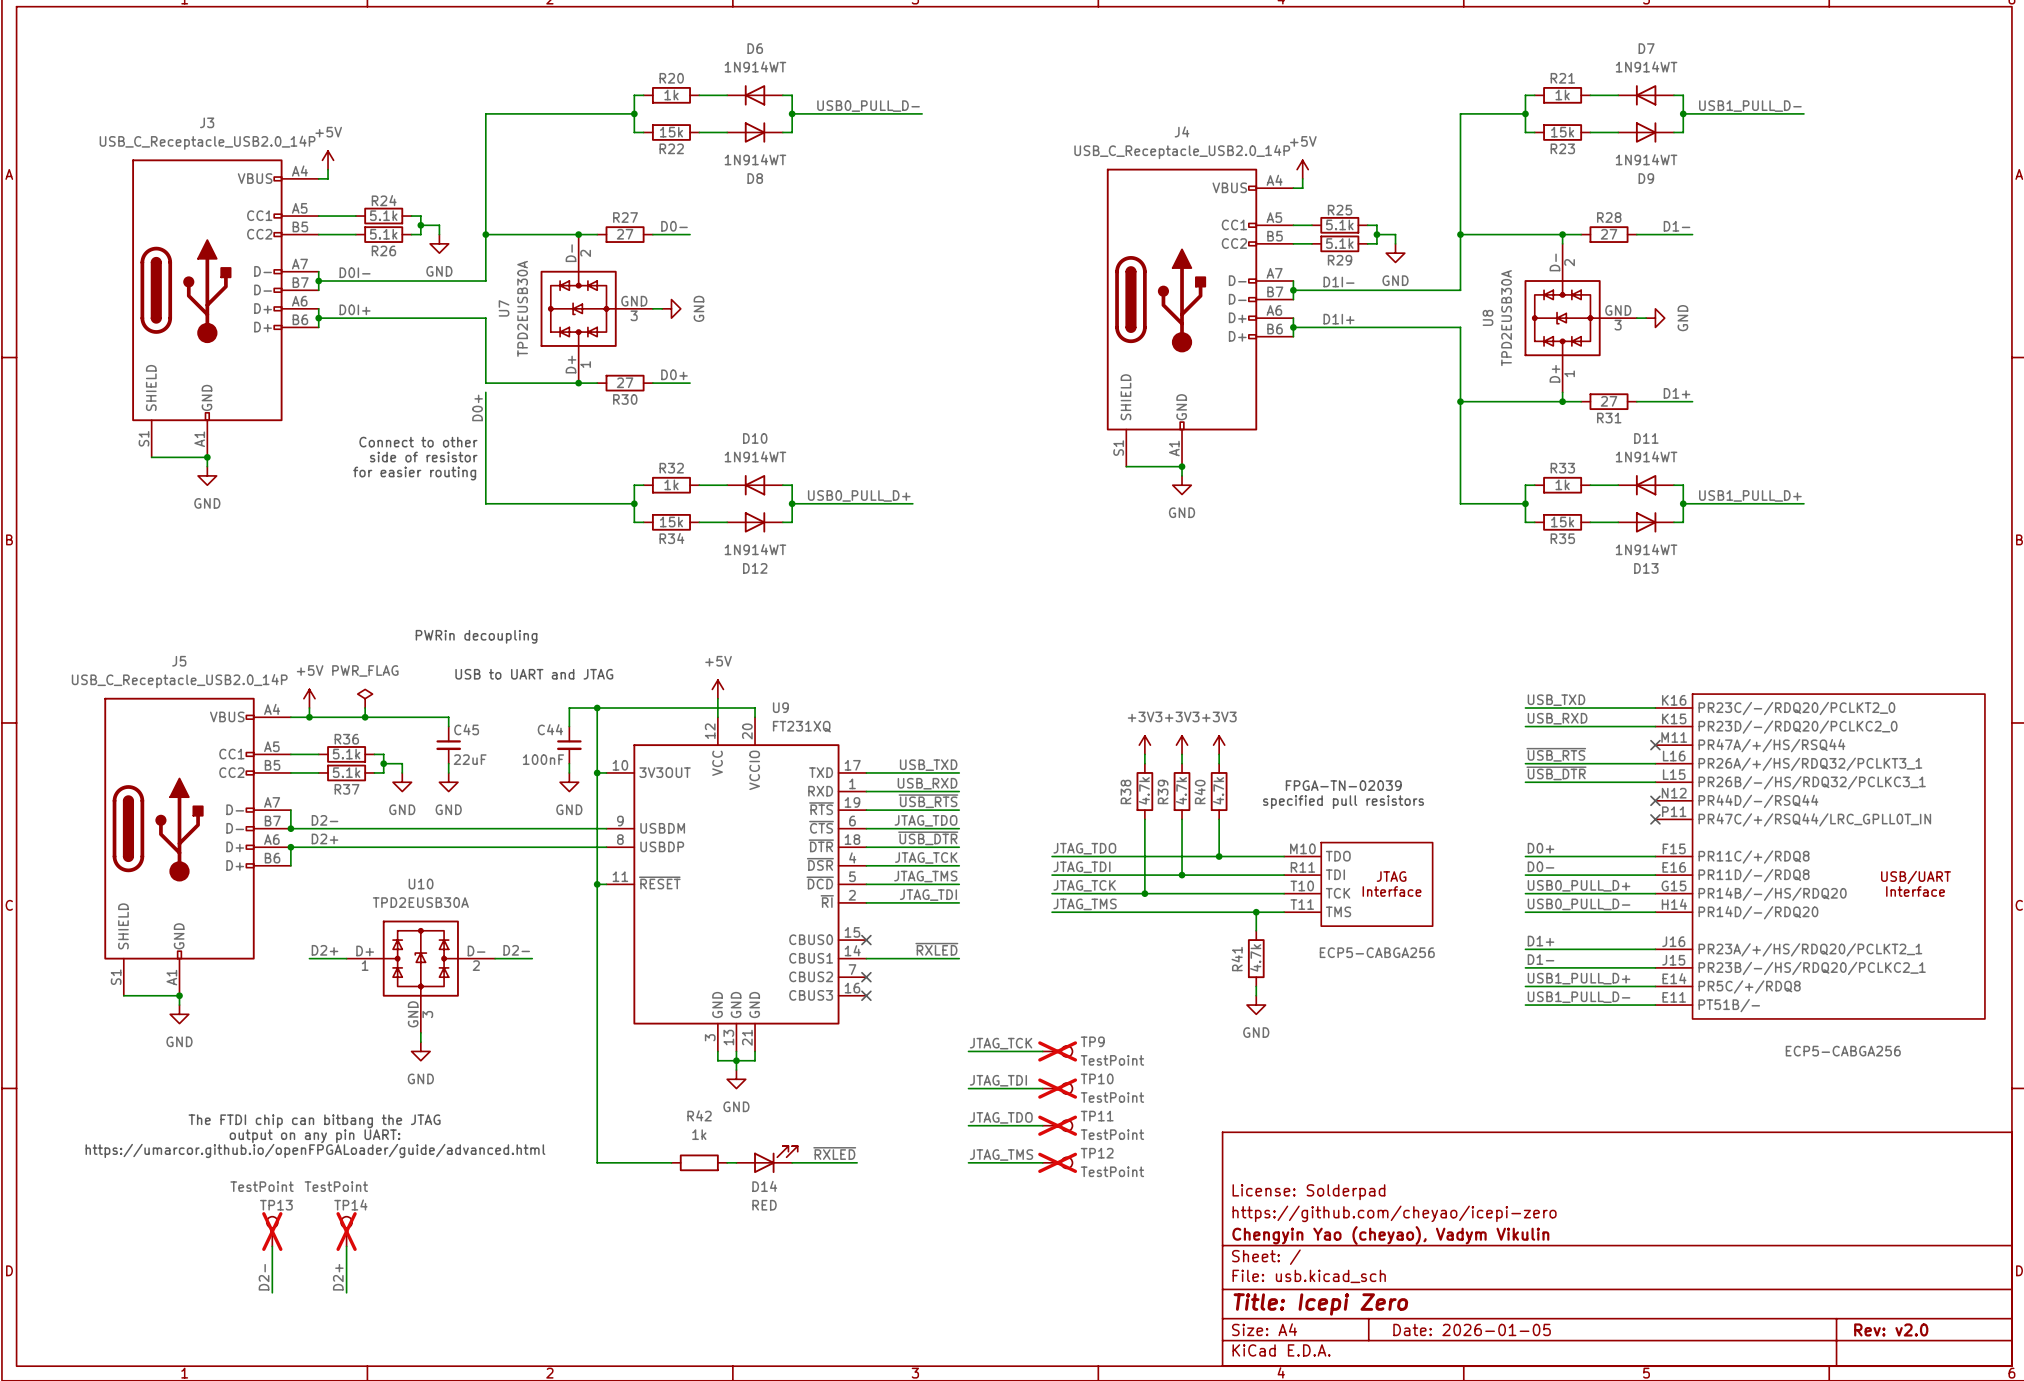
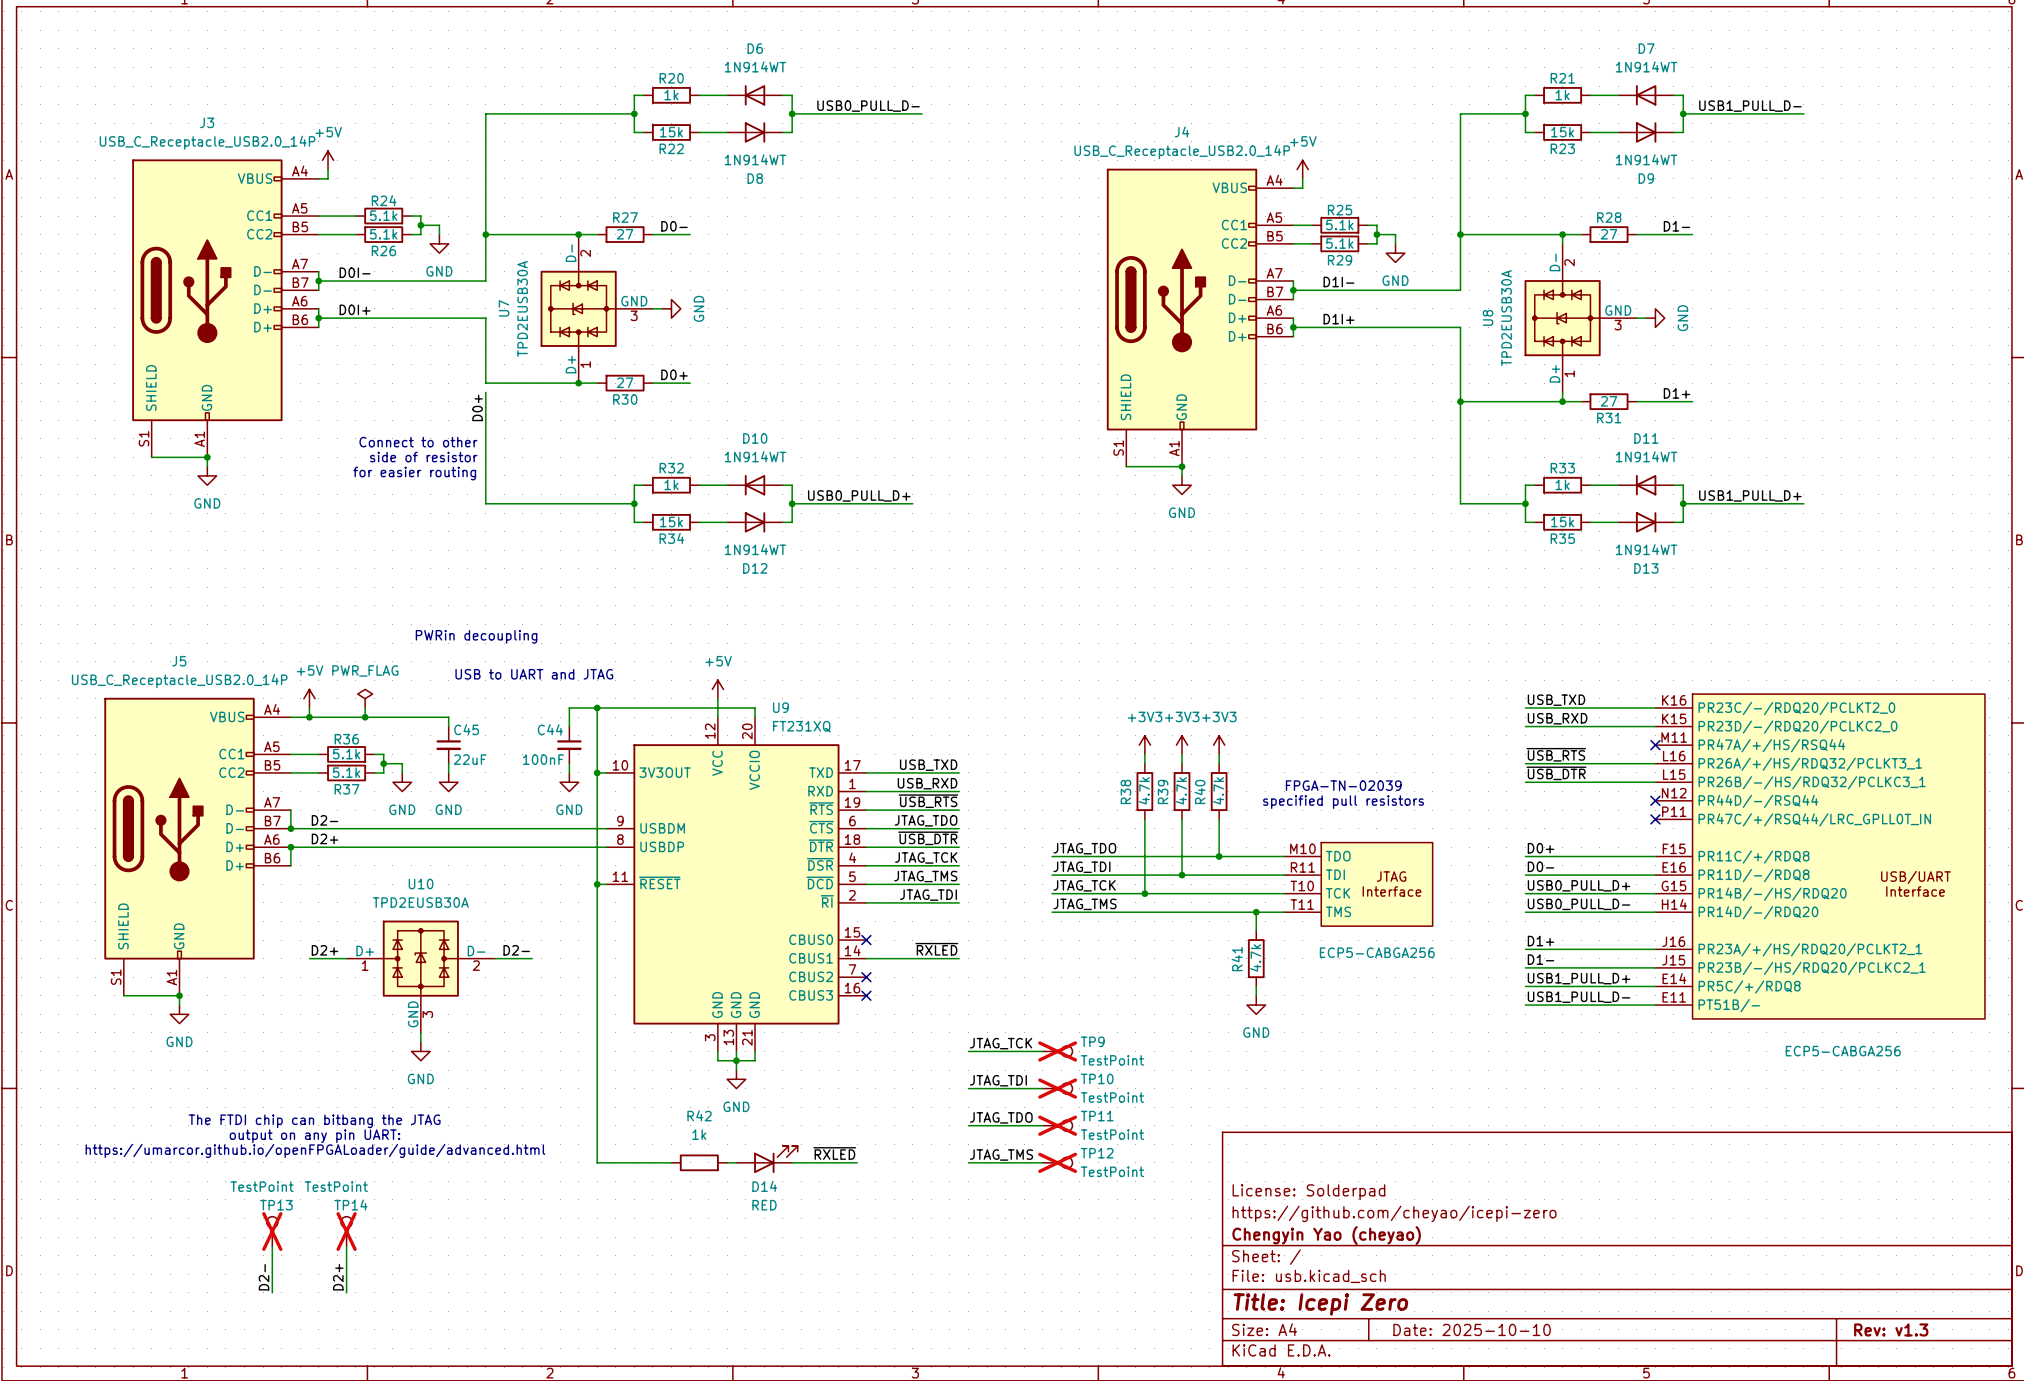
title block: Chengyin Yao (cheyao), Vadym Vikulin (1390, 1235) -> Chengyin Yao (cheyao) (1326, 1235)
title block: Date: 2026-01-05 (1472, 1329) -> Date: 2025-10-10 (1472, 1329)
title block: Rev: v2.0 (1891, 1329) -> Rev: v1.3 (1891, 1329)

